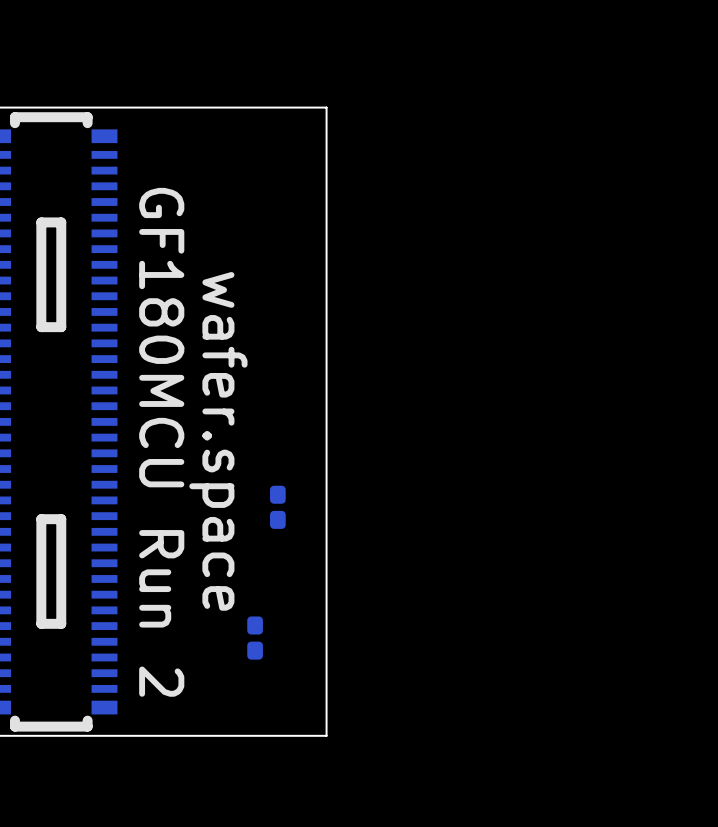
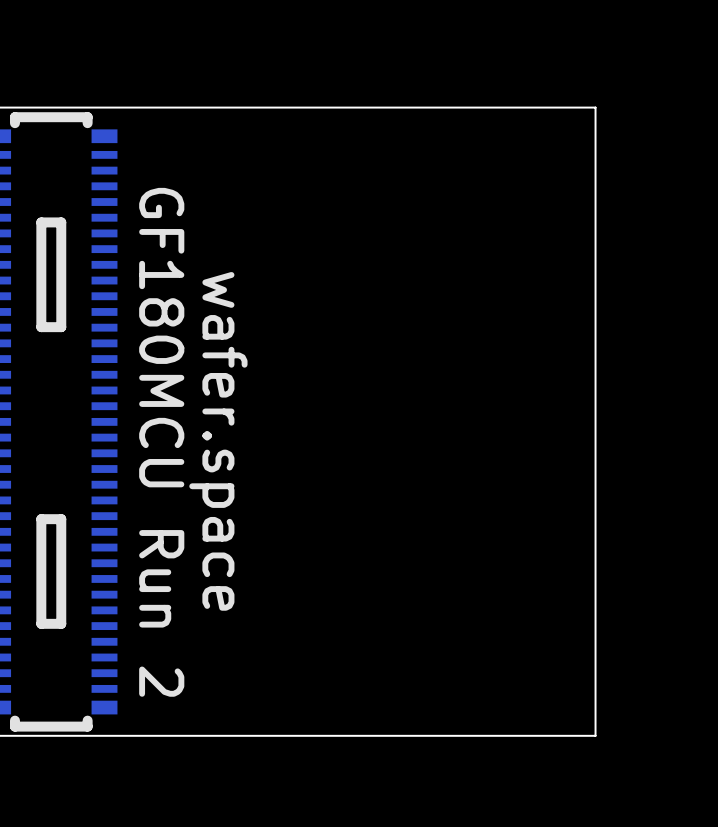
board edge: (326, 107) (326, 735) -> (326, 107) (595, 107) (595, 735) (326, 735)
part: (277, 507) -> none
part: (255, 638) -> none

